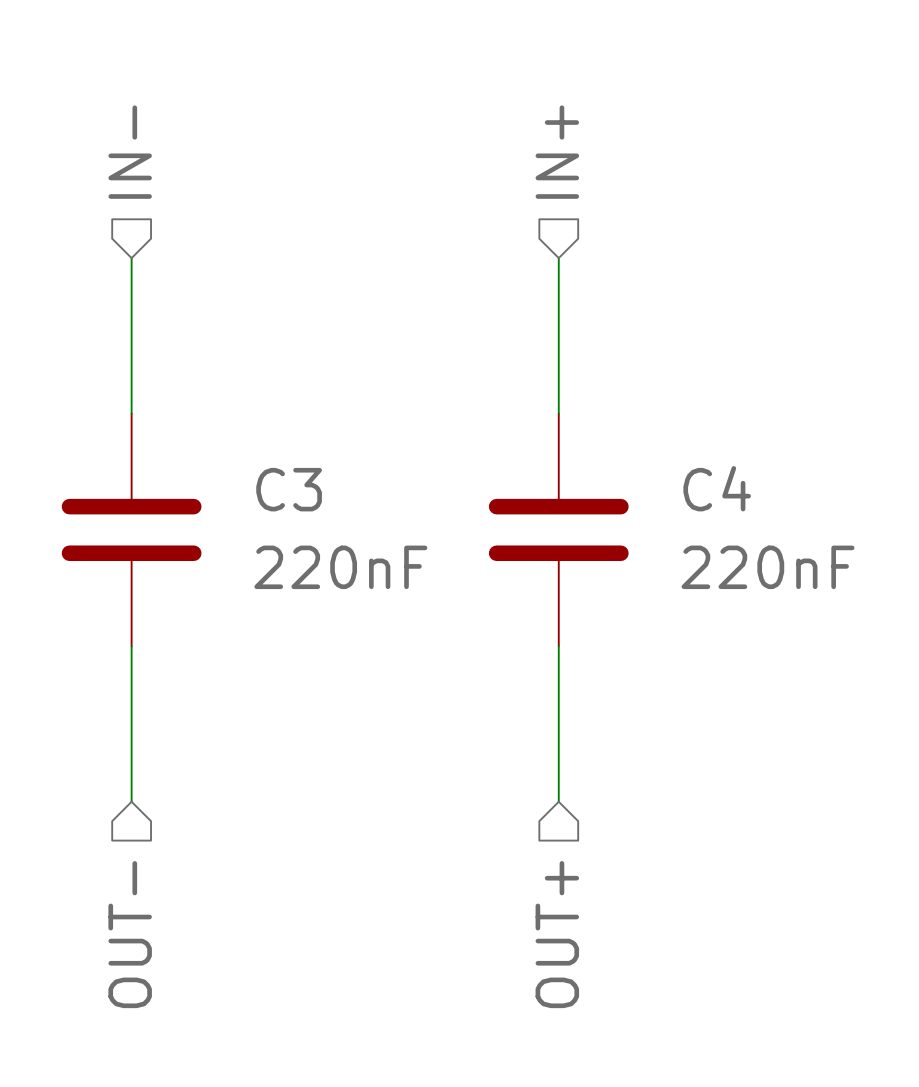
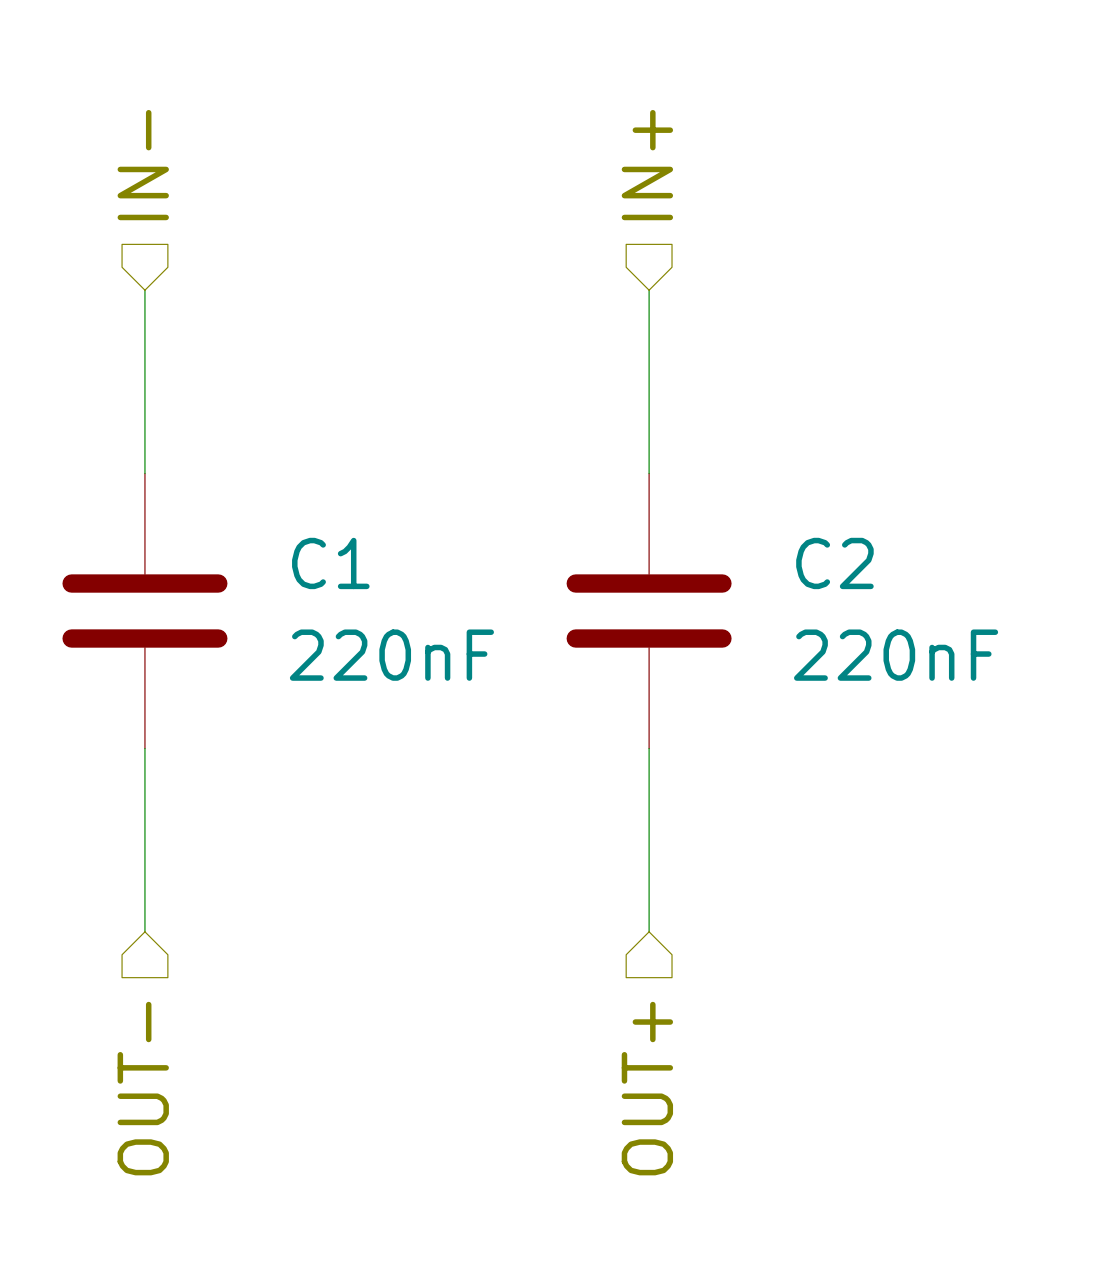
C4 name: C4 (717, 488) -> C2 (834, 563)
C3 name: C3 (289, 489) -> C1 (330, 563)

